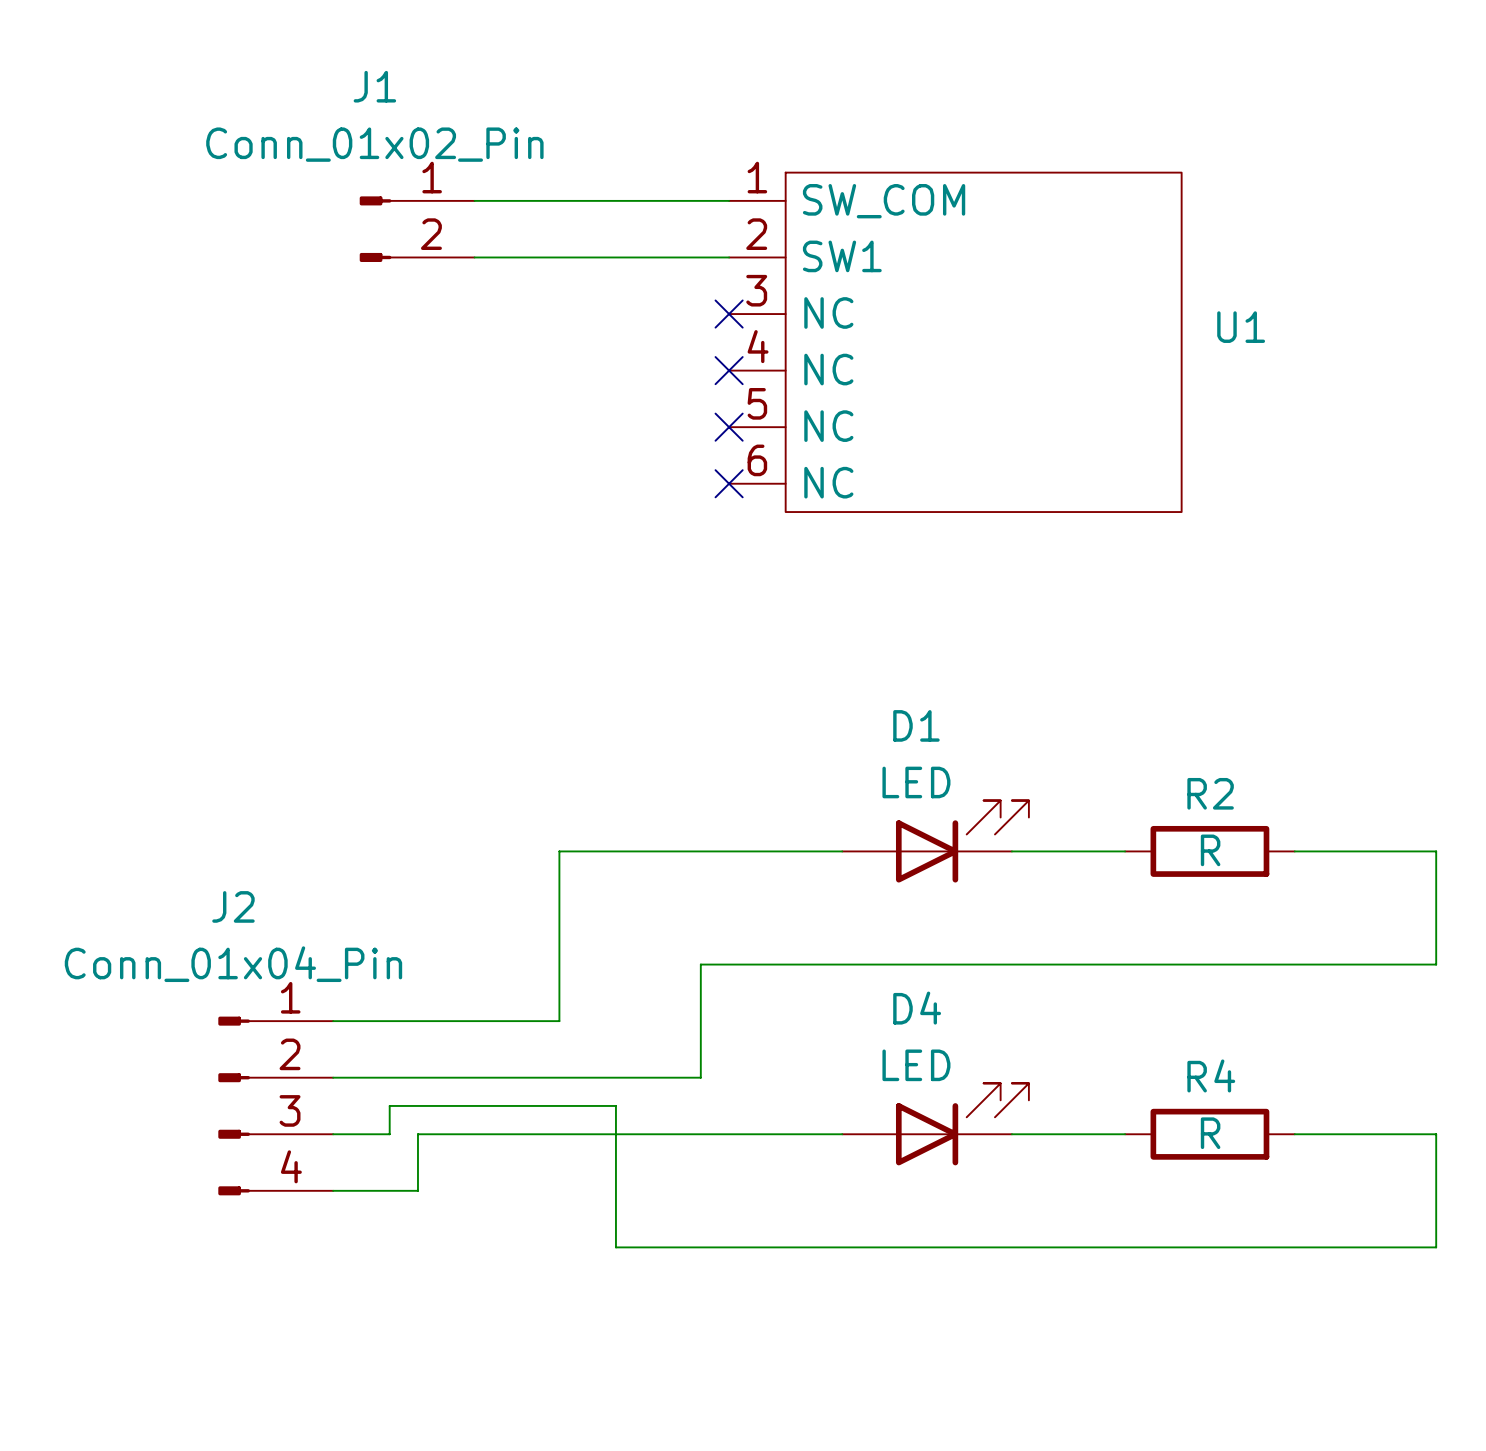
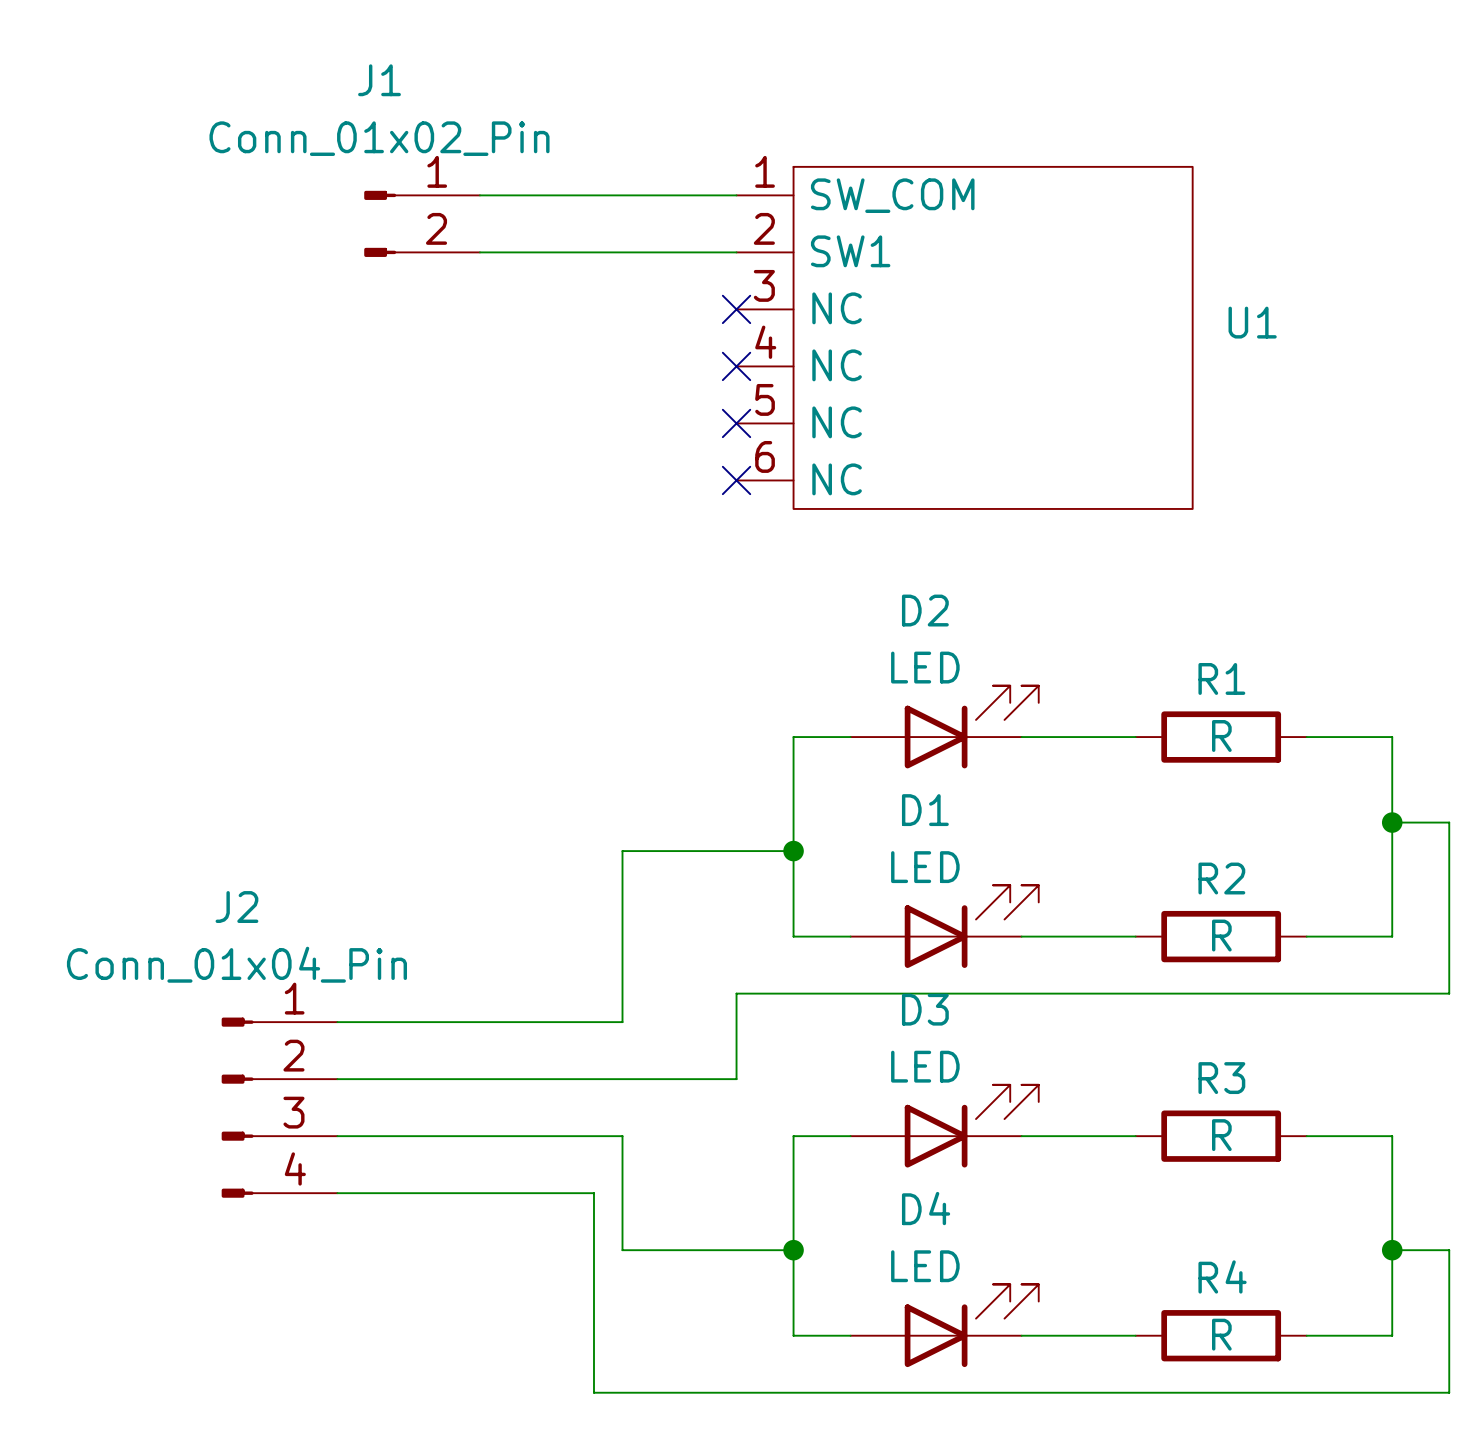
D2: none -> LED (944, 727)
wire: none -> (850, 737) (793, 737) (793, 936) (850, 936)
wire: none -> (1021, 737) (1135, 737)
R1: none -> R (1221, 737)
wire: none -> (1306, 737) (1392, 737) (1392, 936) (1306, 936)
junction: none -> (1392, 822)
D1 position: (935, 841) -> (944, 926)
wire: (615, 851) (559, 851) (559, 1021) -> (622, 851) (622, 1022) (565, 1022)
wire: (785, 851) (842, 851) -> none
junction: none -> (793, 851)
wire: (1011, 851) (1125, 851) -> (1021, 936) (1135, 936)
R2 position: (1209, 851) -> (1221, 936)
wire: (1294, 851) (1436, 851) -> (1392, 822) (1449, 822) (1449, 851)
wire: (1436, 964) (700, 964) (700, 1077) -> (1449, 965) (1449, 993) (736, 993) (736, 1079) (708, 1079)
D4 name: D4 (917, 1008) -> D3 (925, 1009)
R4 name: R4 (1211, 1075) -> R3 (1221, 1078)
wire: (389, 1134) (389, 1105) (615, 1105) (615, 1134) (785, 1134) -> (850, 1335) (793, 1335) (793, 1136)
wire: (417, 1134) (417, 1190) -> (422, 1136) (394, 1136)
wire: (1379, 1134) (1436, 1134) (1436, 1247) -> (1392, 1136) (1392, 1335) (1306, 1335)
wire: none -> (422, 1193) (593, 1193) (593, 1392) (1449, 1392) (1449, 1250)
wire: (785, 1247) (1379, 1247) -> none
junction: none -> (793, 1250)
junction: none -> (1392, 1250)
D4: none -> LED (944, 1325)
wire: none -> (1021, 1335) (1135, 1335)
R4: none -> R (1221, 1335)

